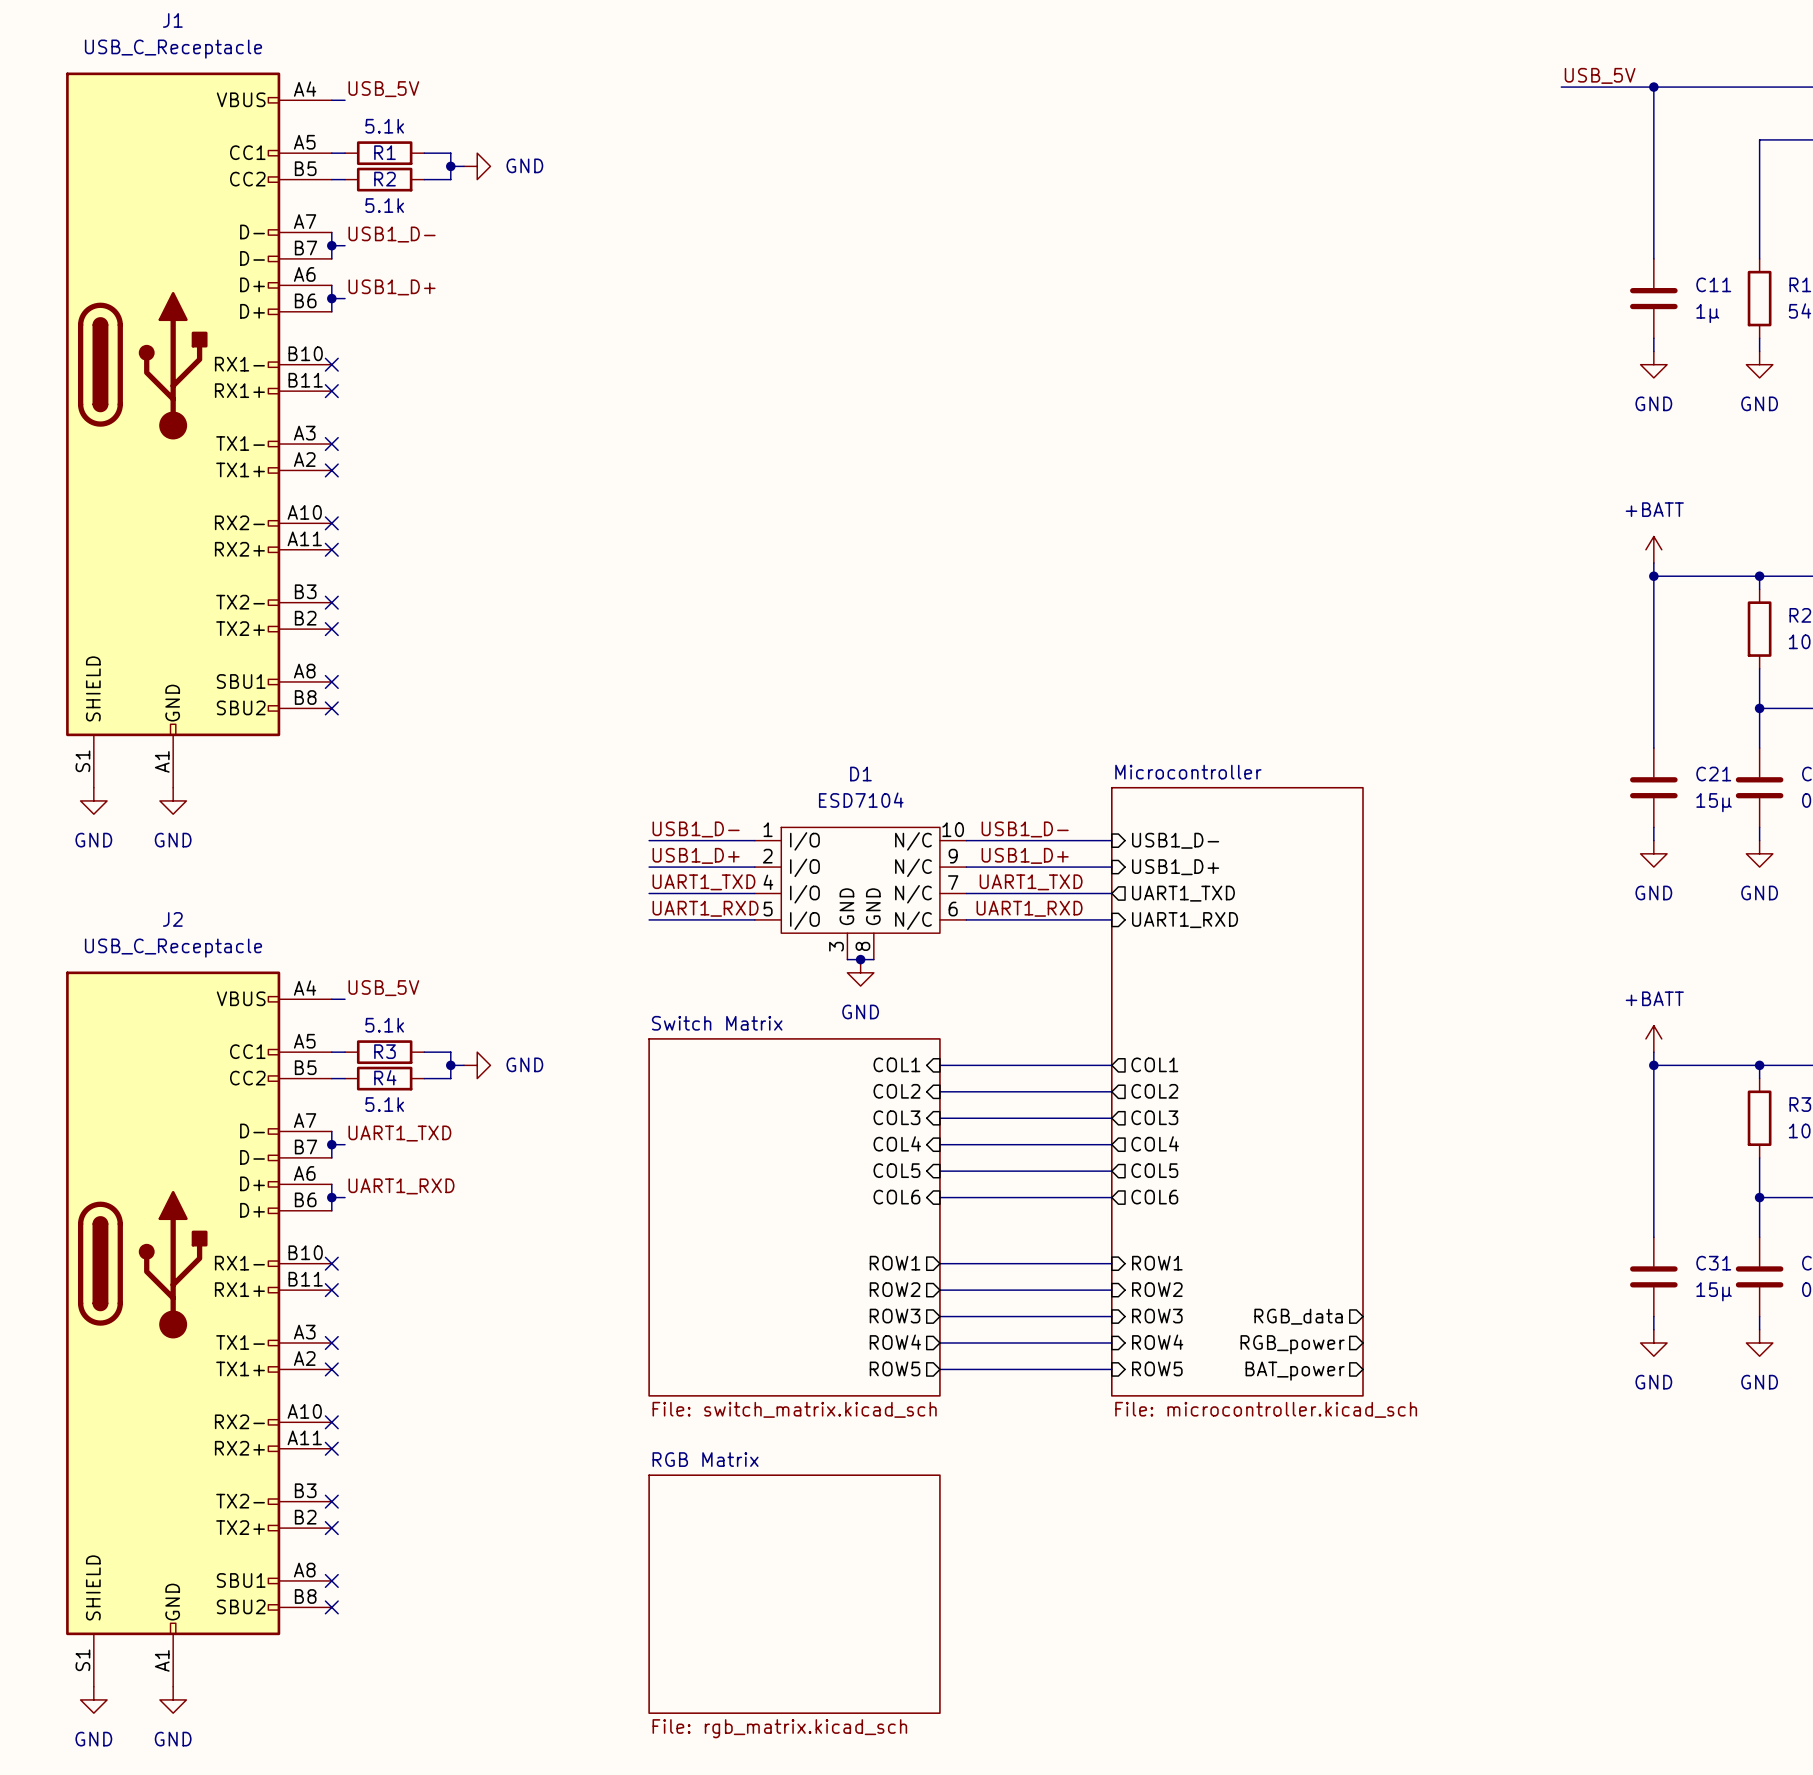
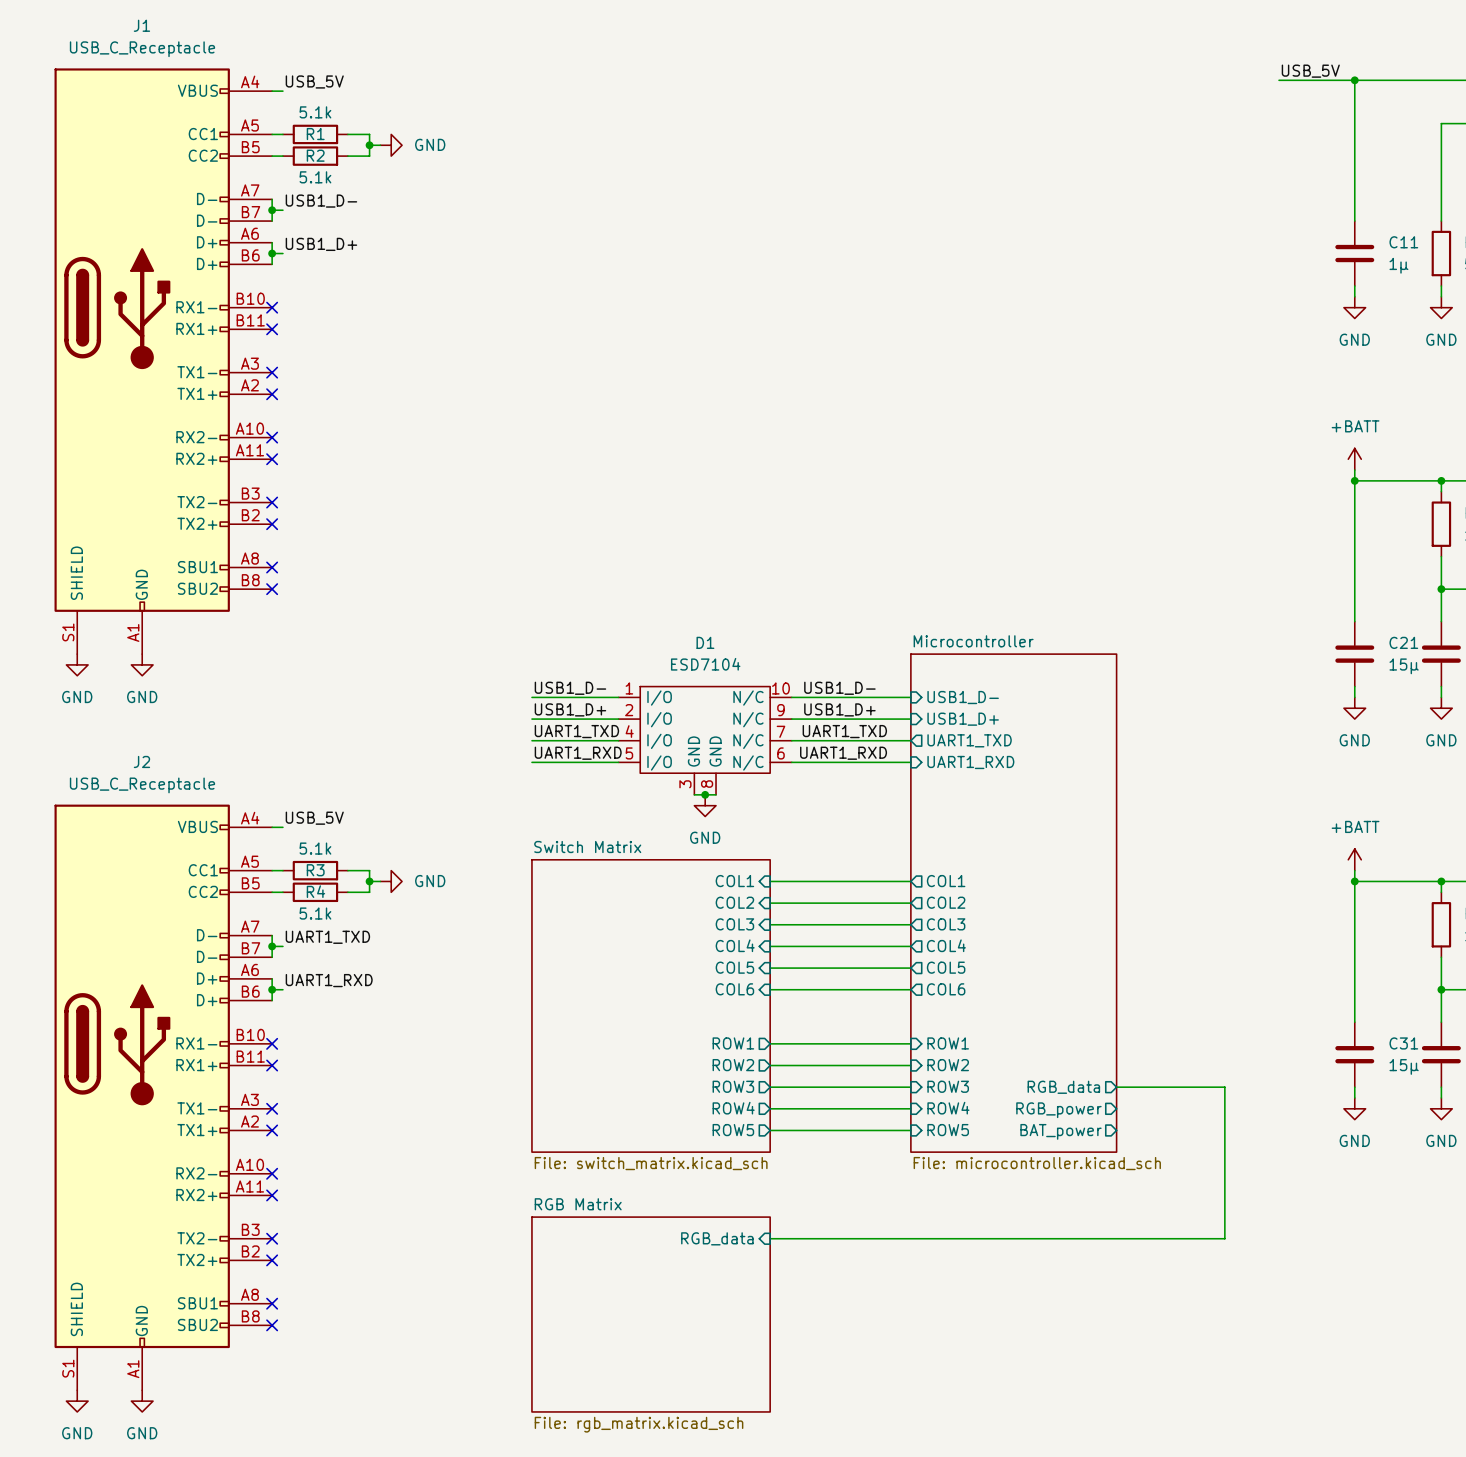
wire: none -> (1116, 1087) (1224, 1087) (1224, 1238) (770, 1238)
sheet pin: none -> RGB_data (717, 1238)

